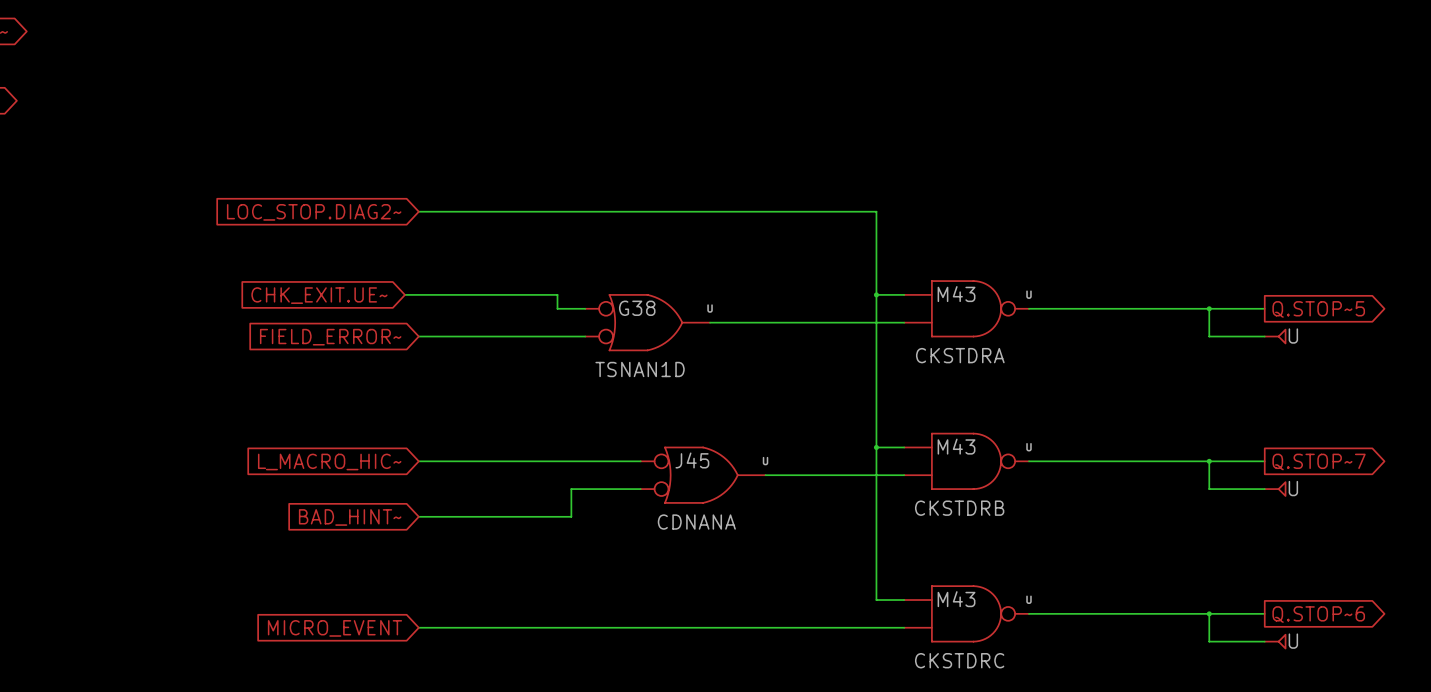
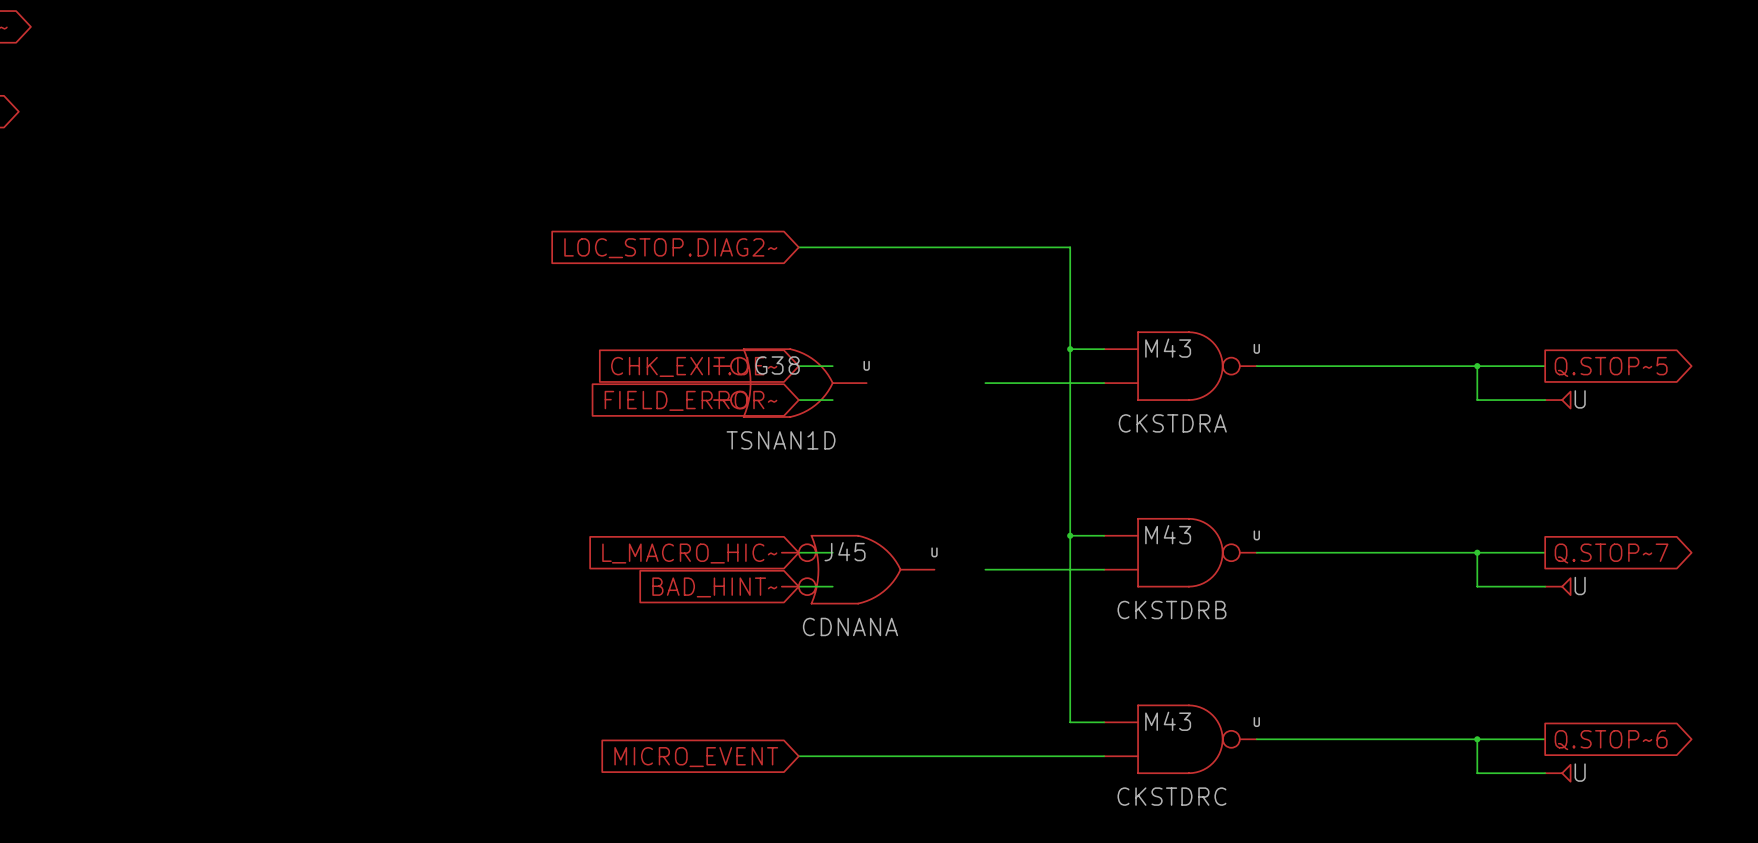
wire: (418, 211) (654, 211) -> none
global label: LOC_STOP.DIAG2~ (314, 212) -> none
global label: none -> LOC_STOP.DIAG2~ (670, 248)
wire: (404, 294) (557, 294) (557, 308) (585, 308) -> none
global label: CHK_EXIT.UE~ (319, 295) -> none
wire: none -> (798, 366) (832, 366)
global label: none -> CHK_EXIT.UE~ (694, 366)
wire: (710, 322) (807, 322) -> none
wire: (418, 336) (585, 336) -> none
wire: none -> (798, 400) (832, 400)
global label: FIELD_ERROR~ (330, 337) -> none
global label: none -> FIELD_ERROR~ (691, 400)
global label: L_MACRO_HIC~ (329, 461) -> none
wire: (418, 461) (640, 461) -> none
global label: none -> L_MACRO_HIC~ (689, 553)
wire: none -> (798, 552) (832, 552)
wire: (765, 475) (807, 475) -> none
global label: none -> BAD_HINT~ (714, 587)
wire: (640, 489) (571, 489) (571, 516) (418, 516) -> none
wire: none -> (798, 586) (832, 586)
global label: BAD_HINT~ (350, 517) -> none
wire: (418, 627) (654, 627) -> none
global label: MICRO_EVENT (334, 628) -> none
global label: none -> MICRO_EVENT (696, 757)

